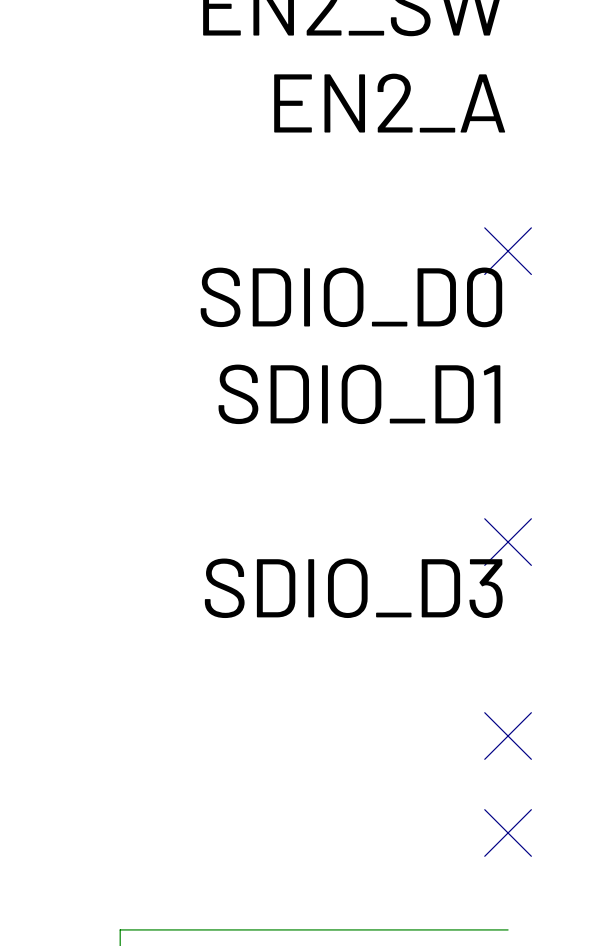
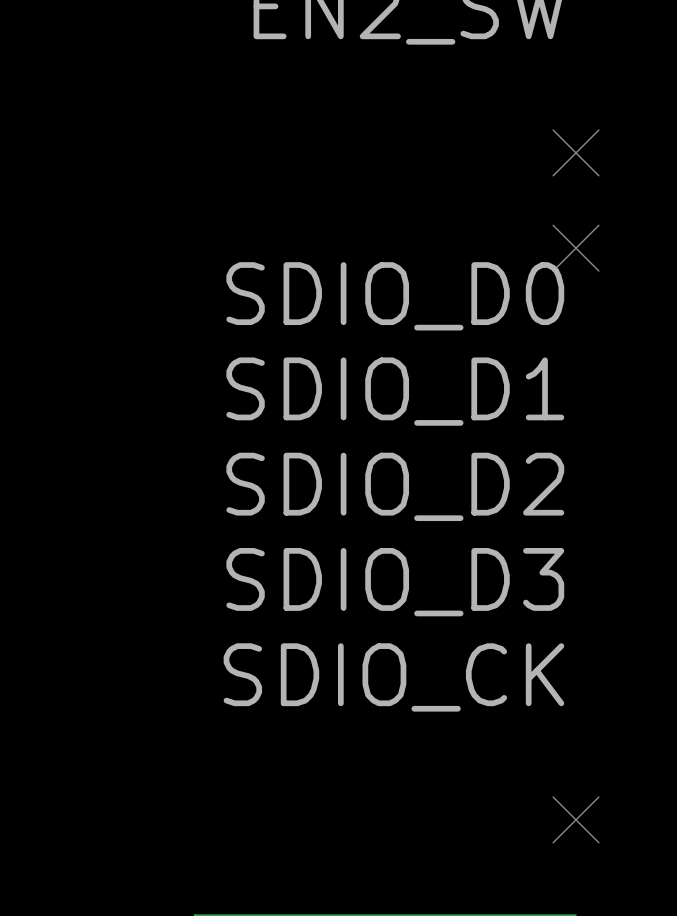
label: EN2_A (389, 103) -> none
no-connect mark: none -> (576, 152)
label: none -> SDIO_D2 (395, 486)
no-connect mark: (508, 542) -> none
label: none -> SDIO_CK (393, 677)
no-connect mark: (508, 736) -> none

